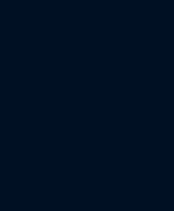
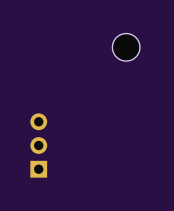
part: none -> (126, 47)
part: none -> (38, 145)

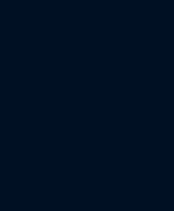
part: (126, 47) -> none
part: (38, 145) -> none

